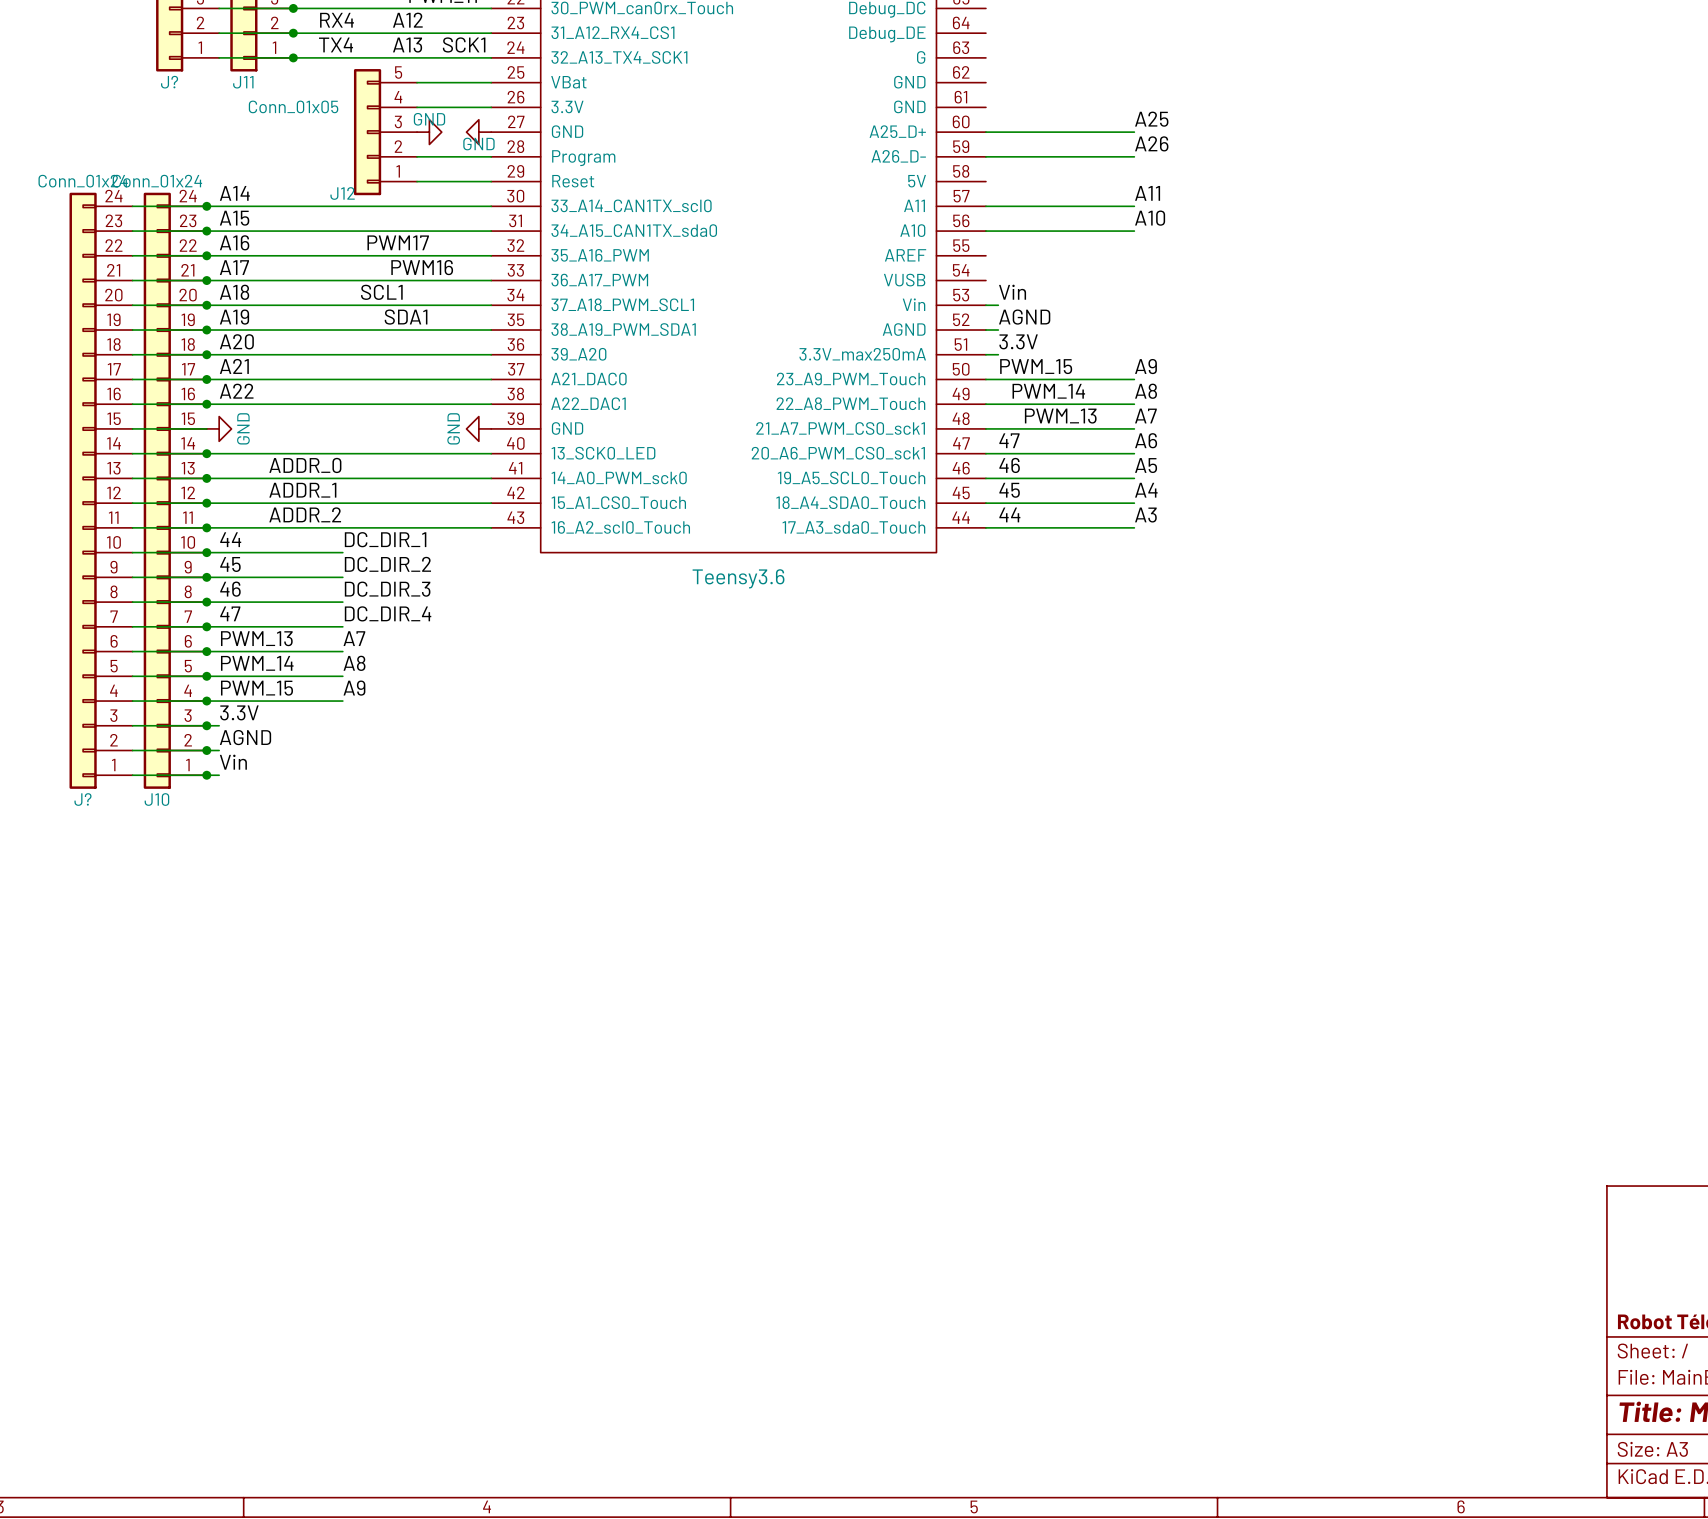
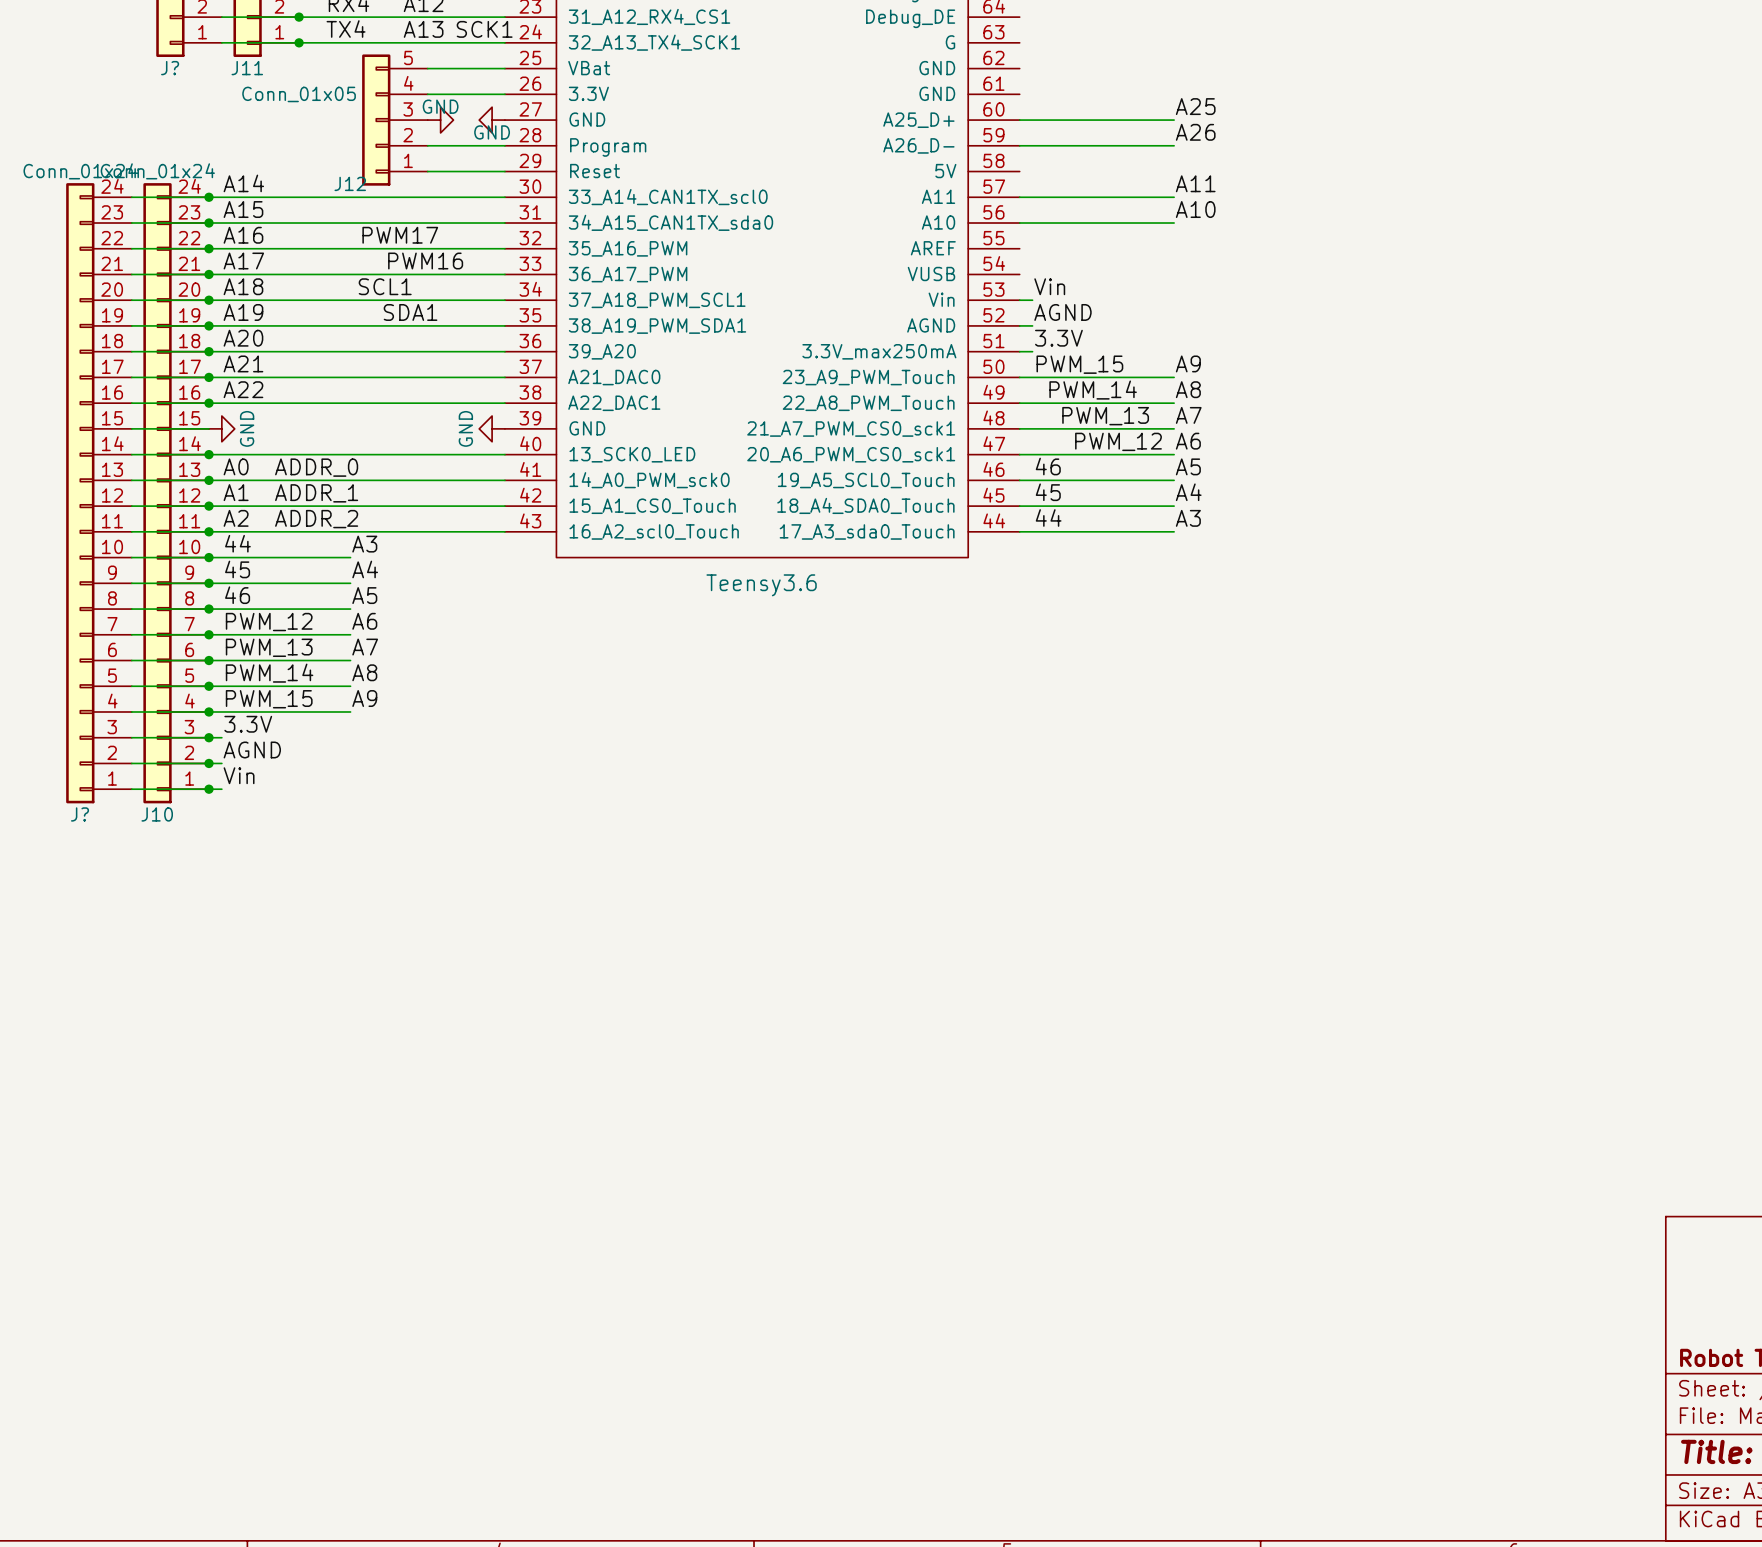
label: 47 (1009, 440) -> none
label: none -> PWM_12 (1118, 441)
label: none -> A0 (236, 466)
label: none -> A1 (236, 492)
label: none -> A2 (236, 518)
label: DC_DIR_1 (385, 539) -> A3 (364, 544)
label: DC_DIR_2 (387, 564) -> A4 (365, 569)
label: DC_DIR_3 (387, 589) -> A5 (364, 595)
label: 47 (230, 613) -> PWM_12 (269, 622)
label: DC_DIR_4 (388, 613) -> A6 (364, 621)

